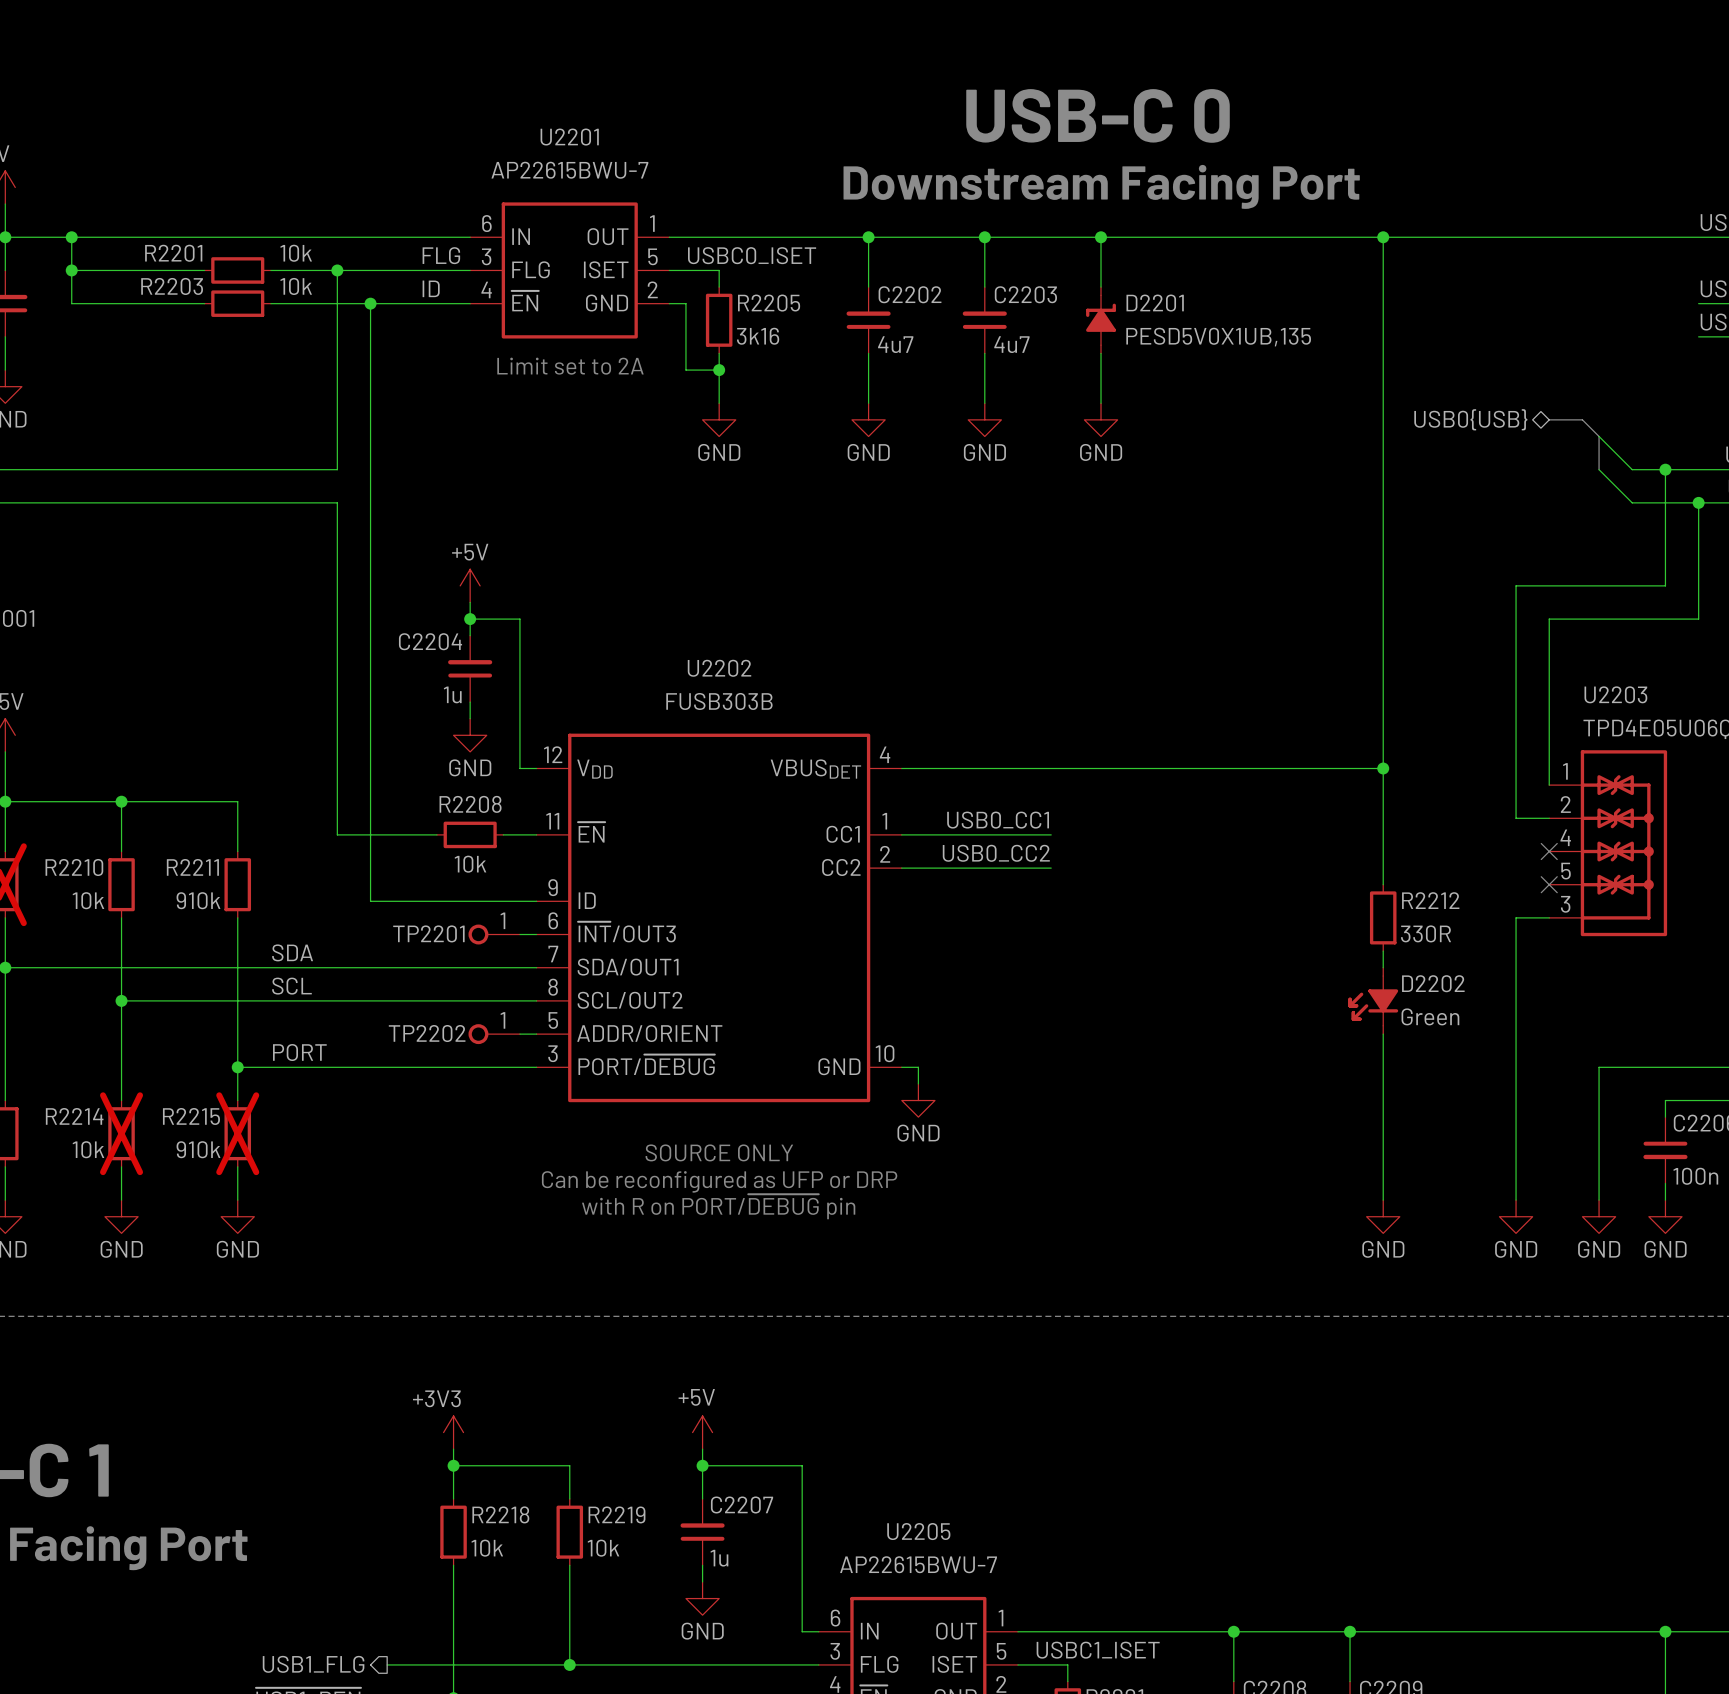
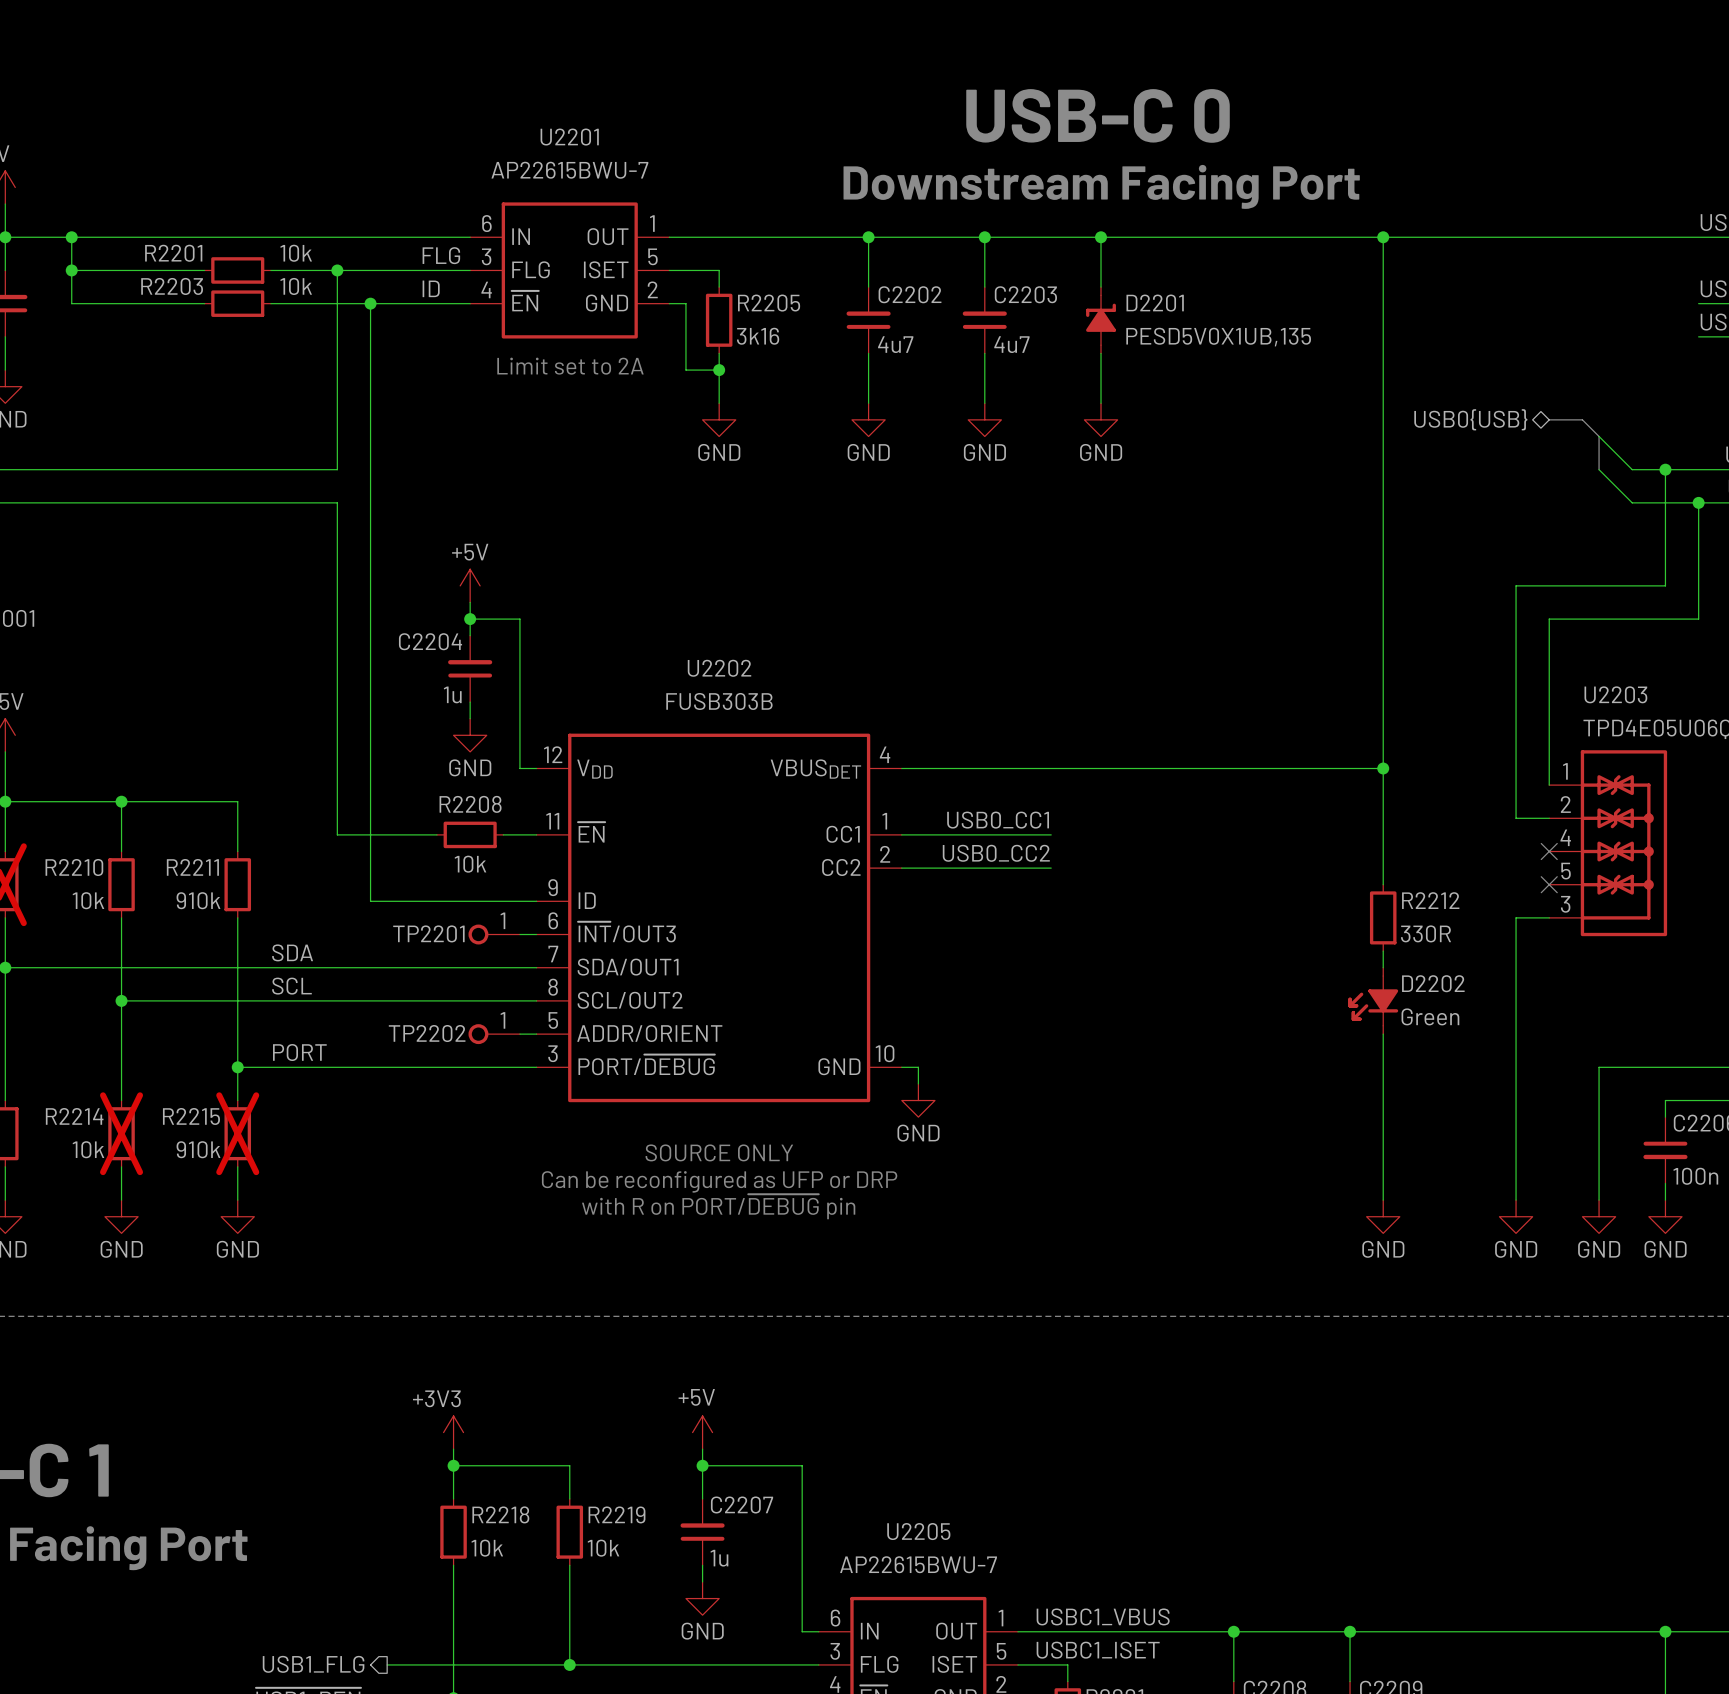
label: USBC0_ISET (752, 255) -> none
label: none -> USBC1_VBUS (1103, 1616)

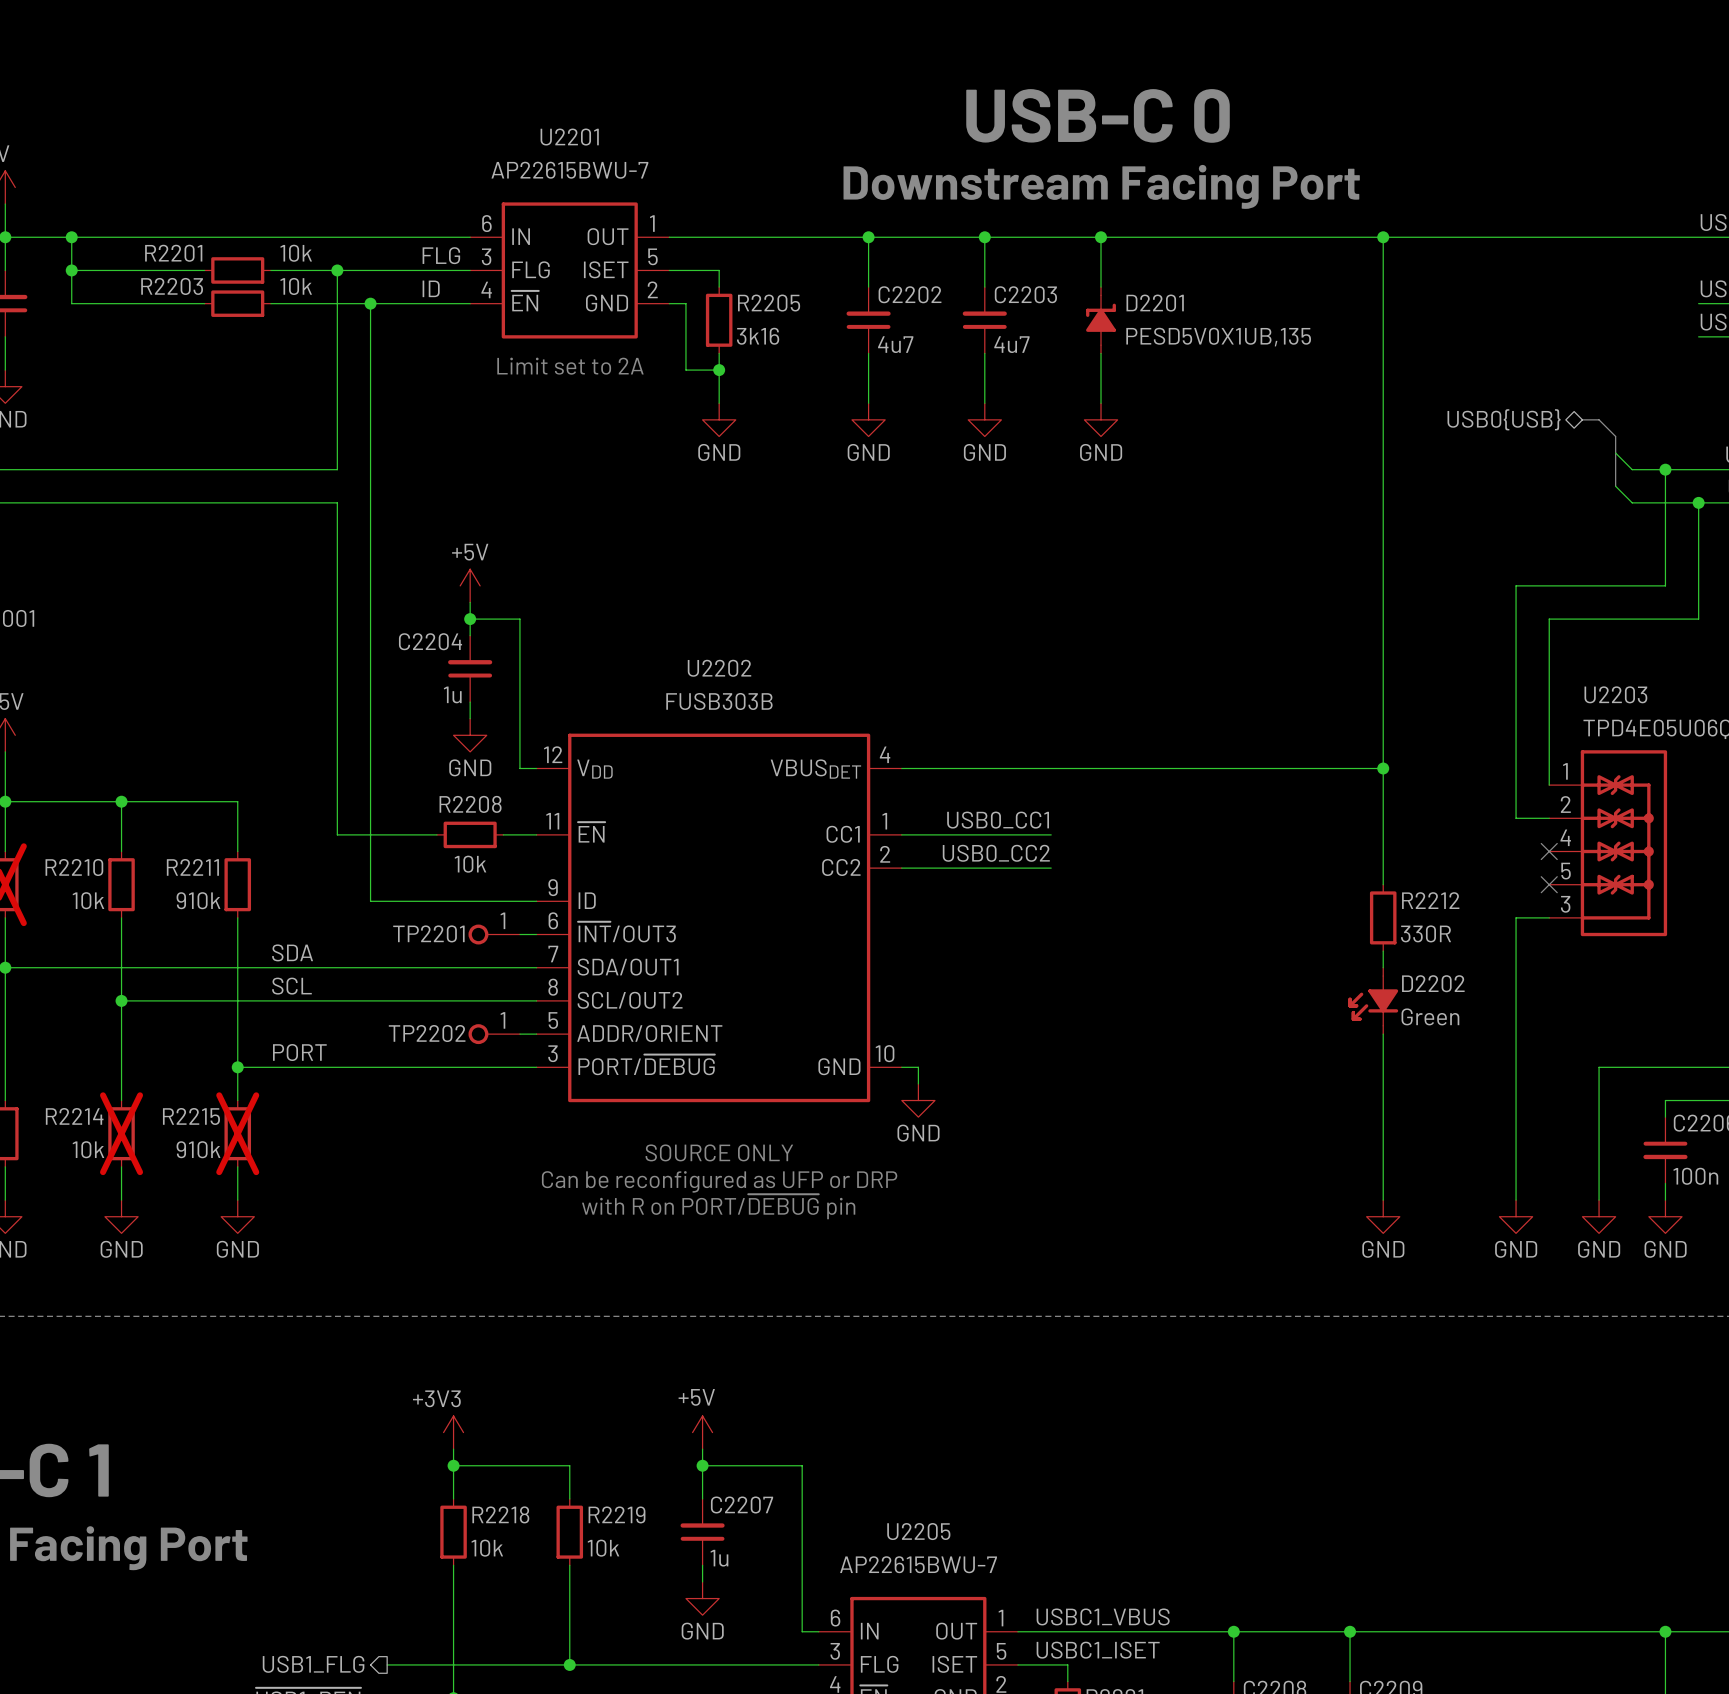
hierarchical label position: USB0{USB} (1470, 419) -> USB0{USB} (1504, 419)
bus: (1549, 419) (1582, 419) (1599, 436) (1599, 469) -> none
bus: none -> (1582, 419) (1599, 419) (1615, 436) (1615, 486)
wire: (1599, 436) (1615, 453) -> none
wire: (1599, 469) (1615, 486) -> none

